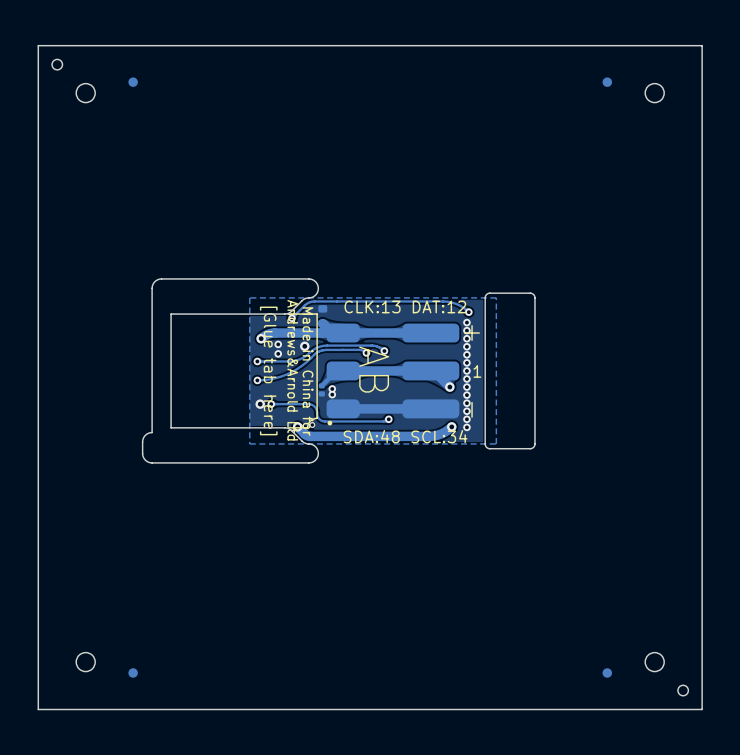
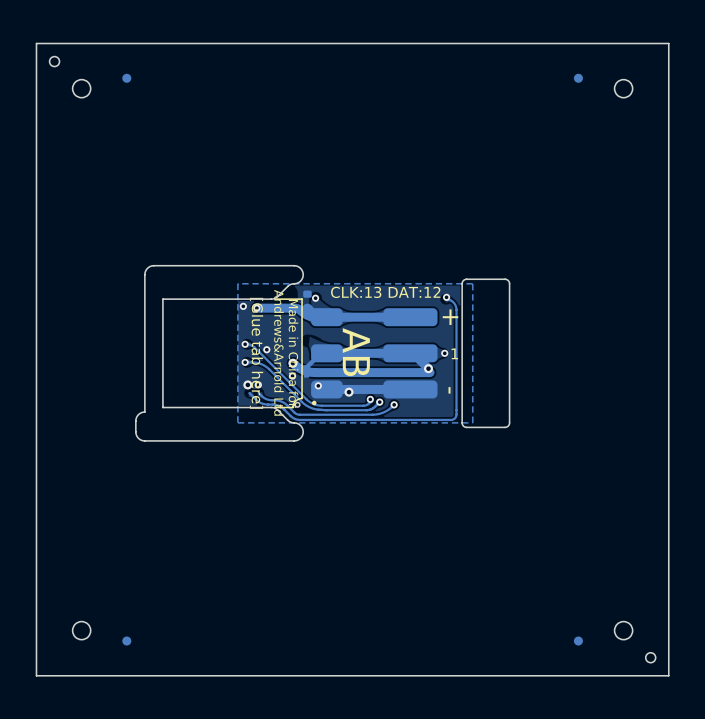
track: (468, 312) (460, 305) (447, 301) (314, 301) (305, 304) (291, 318) -> none
via: none -> (315, 298)
track: none -> (445, 299) (453, 302) (456, 309) (456, 414) (453, 419) (298, 419) (292, 417) (278, 405) (259, 402) (249, 393)
via: (291, 318) -> none
via: none -> (243, 306)
via: (466, 322) -> none
via: none -> (256, 308)
via: (466, 330) -> none
track: (331, 333) (272, 333) (261, 338) -> (315, 317) (308, 315) (296, 308) (256, 308)
via: (261, 338) -> none
via: (466, 338) -> none
via: (278, 344) -> none
via: (304, 346) -> none
via: (466, 346) -> none
track: (342, 349) (360, 349) (366, 352) -> none
track: (342, 349) (326, 349) (317, 352) -> none
track: (384, 351) (372, 345) (323, 345) (294, 360) (257, 361) -> none
via: (384, 351) -> none
track: (317, 352) (291, 372) (275, 378) (257, 380) -> none
via: (366, 352) -> none
via: (278, 353) -> none
via: (466, 354) -> none
track: none -> (246, 344) (254, 347) (313, 404) (364, 405) (369, 403) (370, 399)
via: (466, 362) -> none
via: none -> (266, 349)
via: (466, 379) -> none
track: none -> (246, 362) (256, 362) (265, 366) (303, 403) (312, 408) (367, 410) (373, 408) (379, 402)
track: none -> (293, 363) (299, 368) (311, 372) (430, 372)
via: none -> (293, 363)
via: (466, 387) -> none
via: (332, 388) -> none
via: none -> (292, 376)
via: (332, 394) -> none
via: (466, 395) -> none
via: (466, 403) -> none
track: (271, 404) (310, 404) (315, 408) (318, 418) (323, 421) (383, 421) (388, 419) -> none
via: none -> (318, 385)
via: none -> (349, 392)
via: (466, 411) -> none
track: none -> (258, 393) (266, 399) (283, 402) (298, 414) (376, 414) (386, 410) (394, 404)
via: (466, 419) -> none
via: none -> (379, 402)
via: none -> (394, 404)
via: (297, 426) -> none
track: (451, 426) (441, 433) (428, 436) (309, 436) (297, 426) -> none
via: (451, 426) -> none
via: (466, 427) -> none
text: SDA:48 SCL:34 (405, 436) -> none

